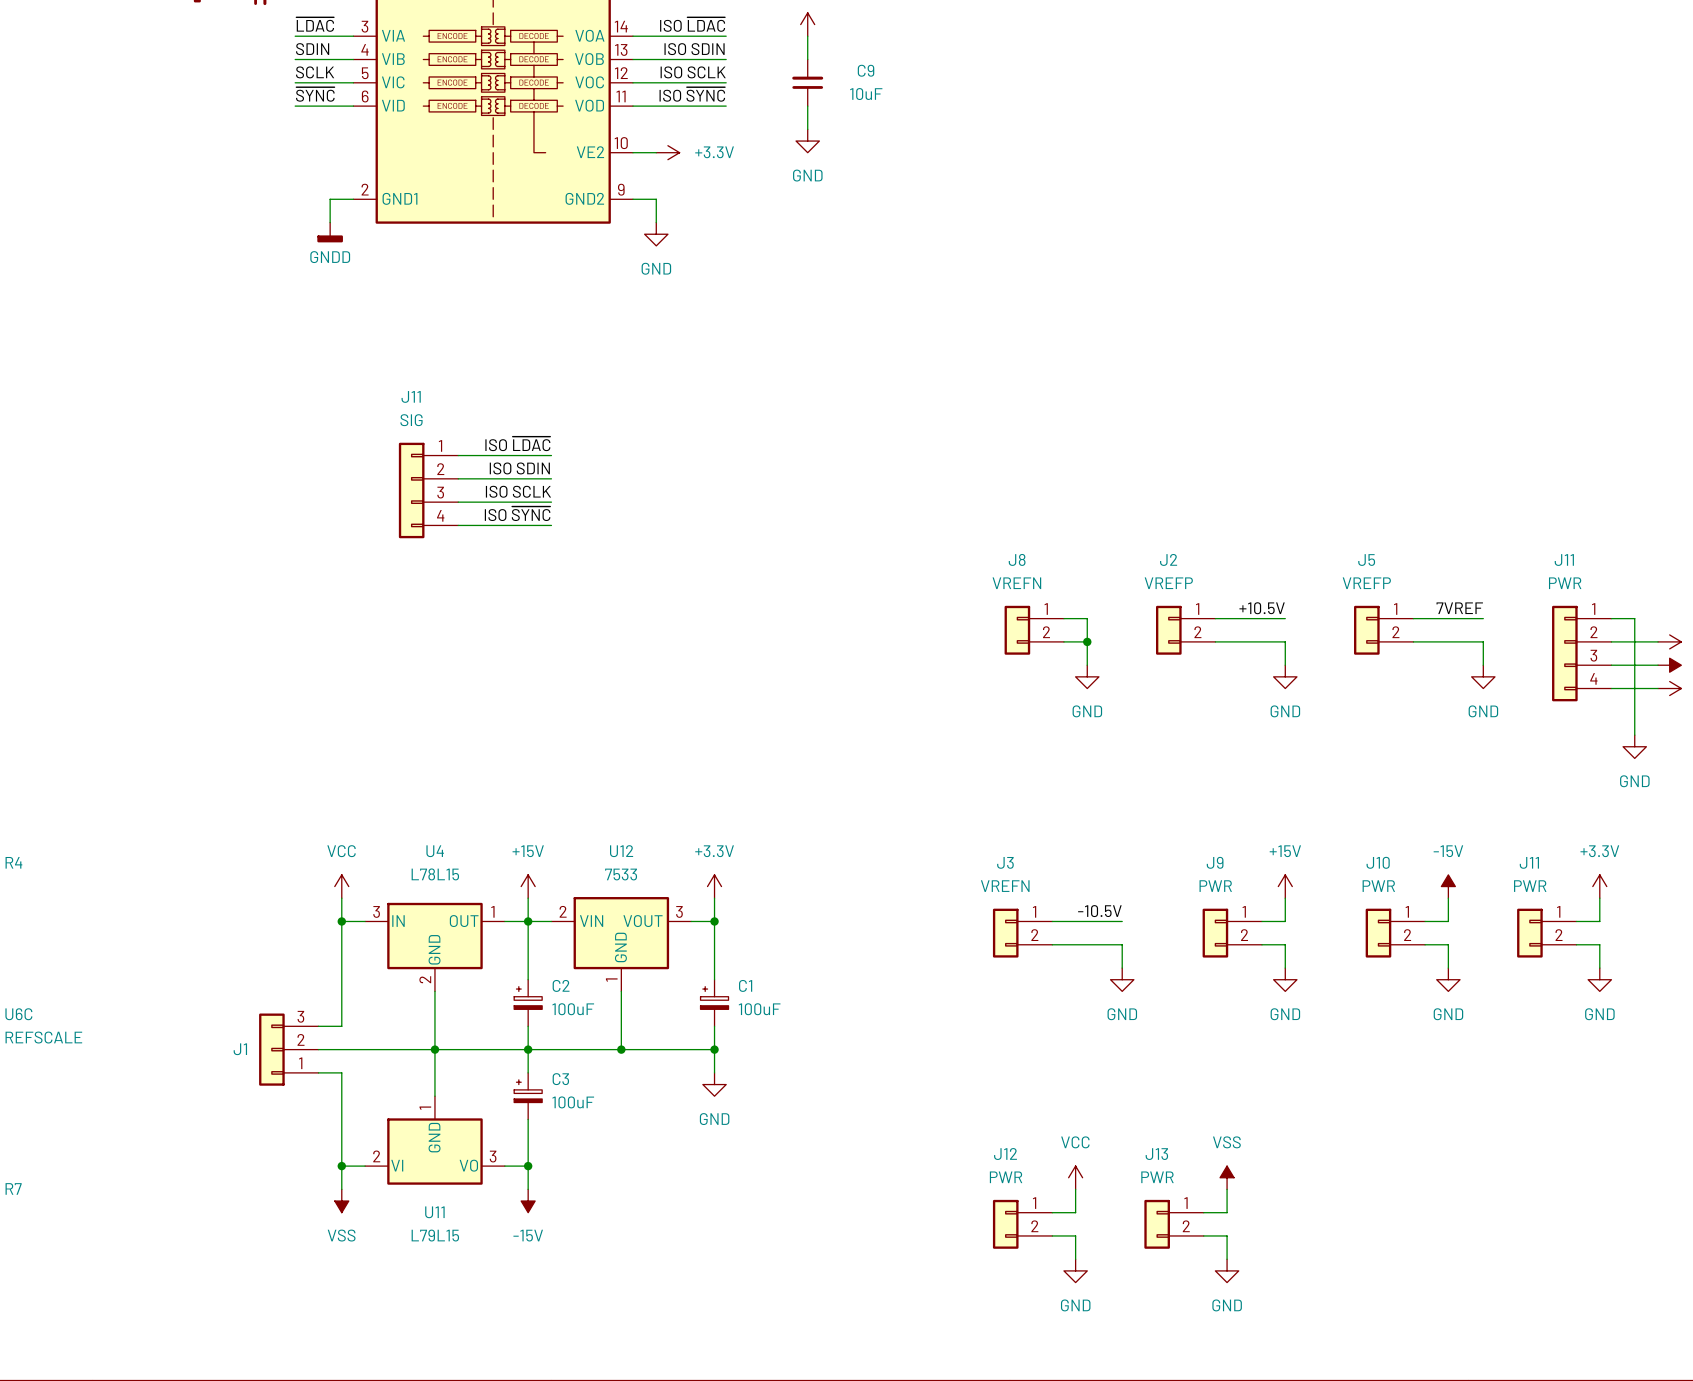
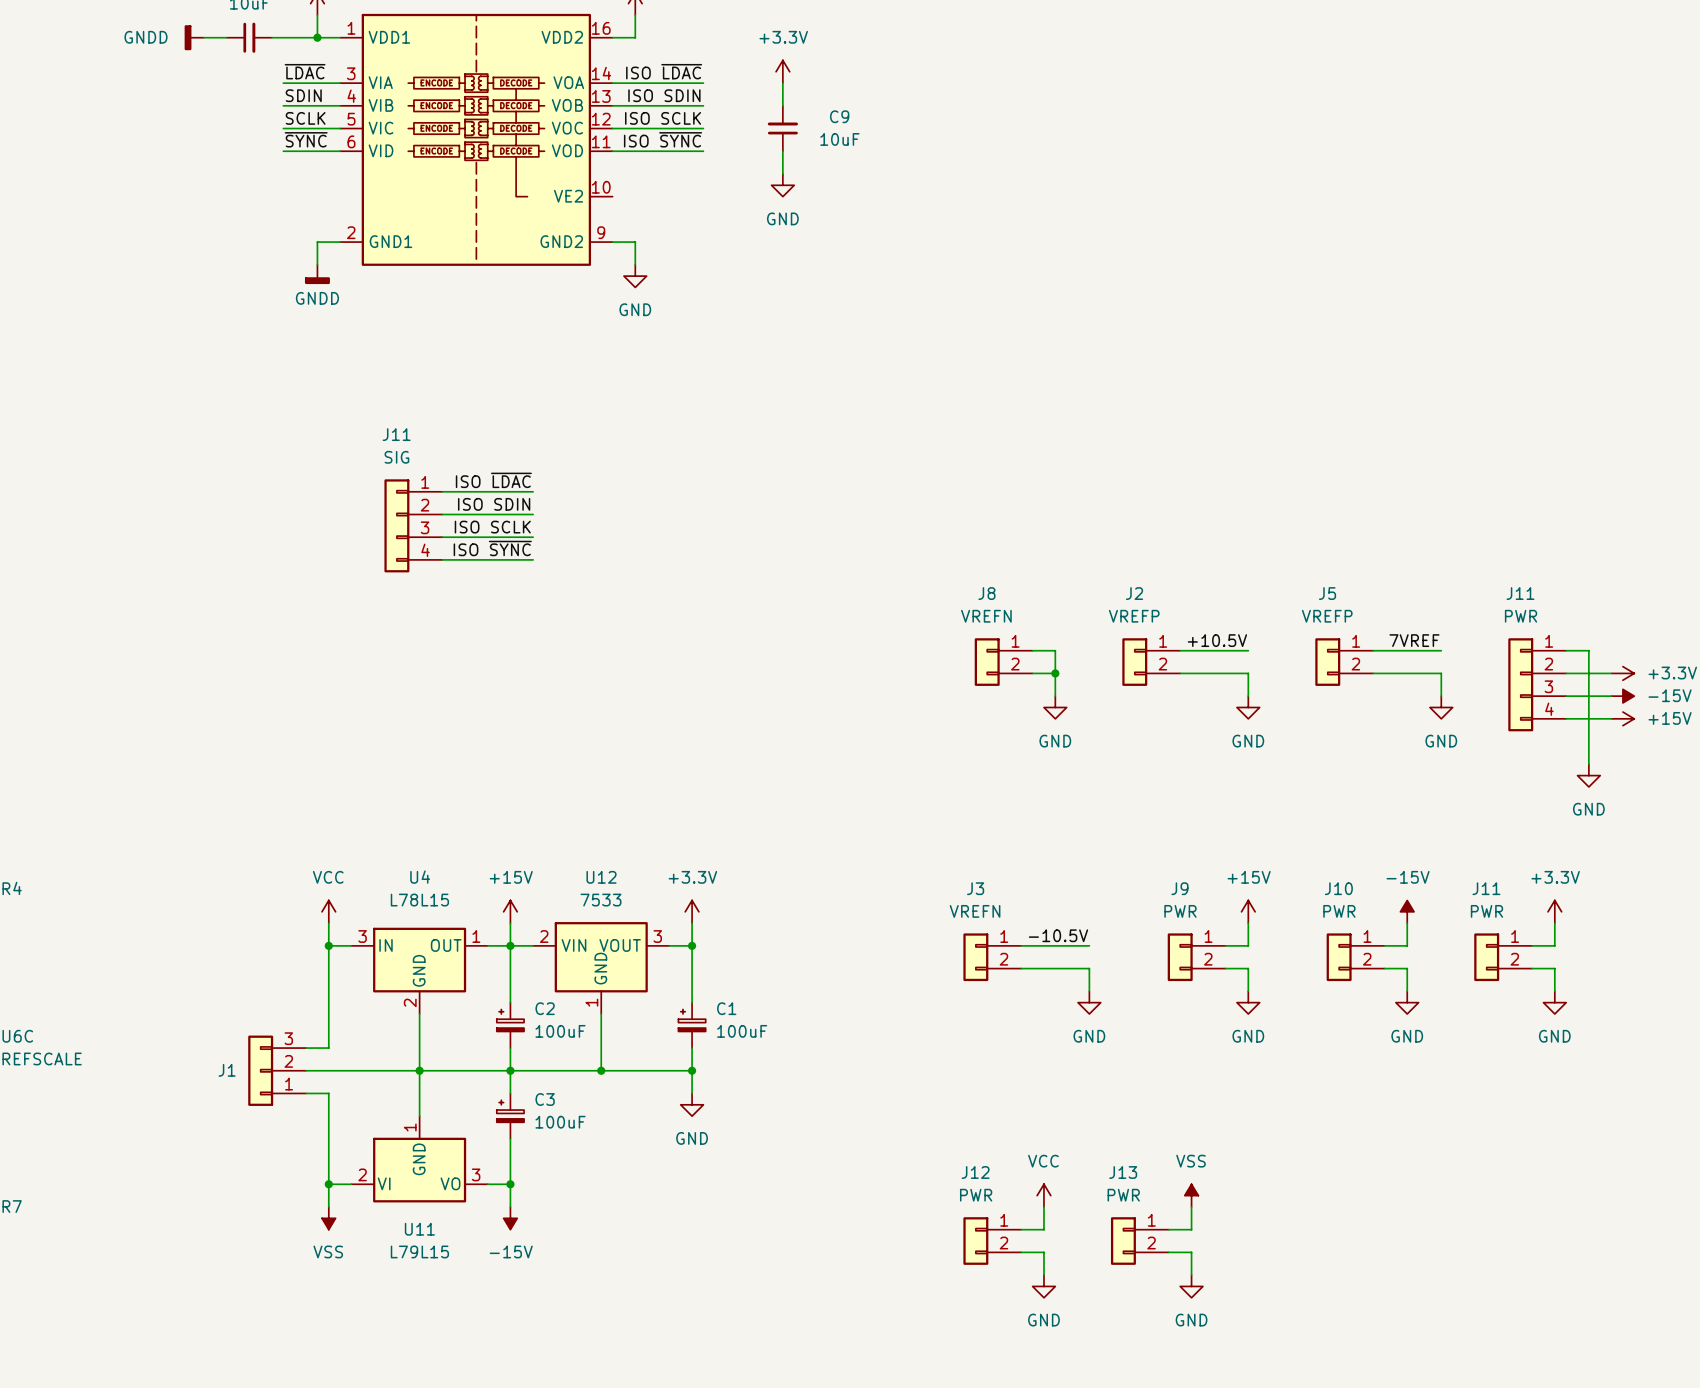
wire: (632, 152) (656, 152) -> none
power symbol: +3.3V (667, 152) -> none

